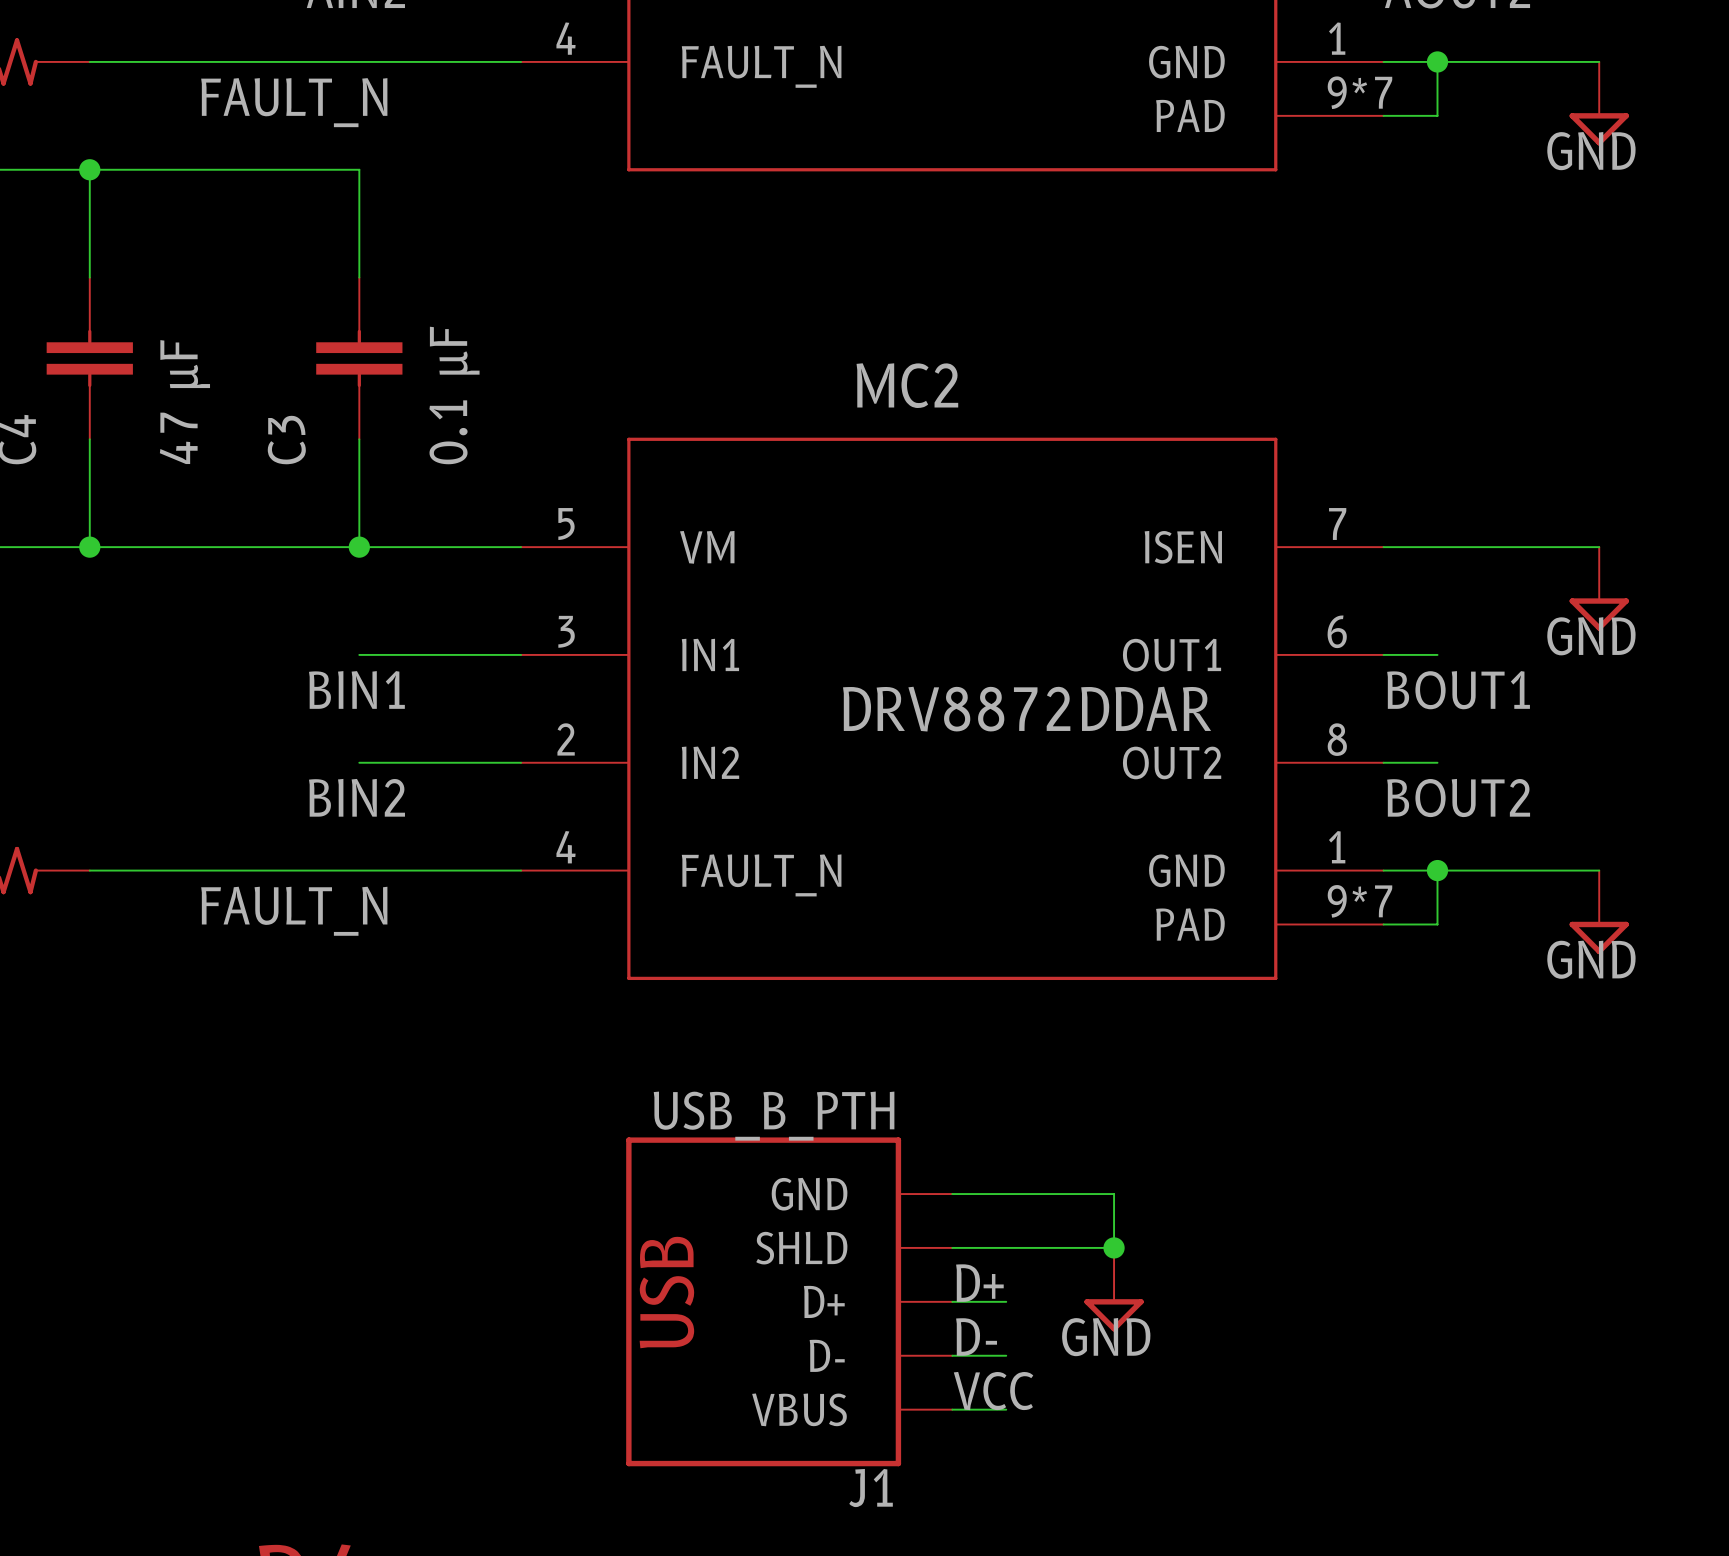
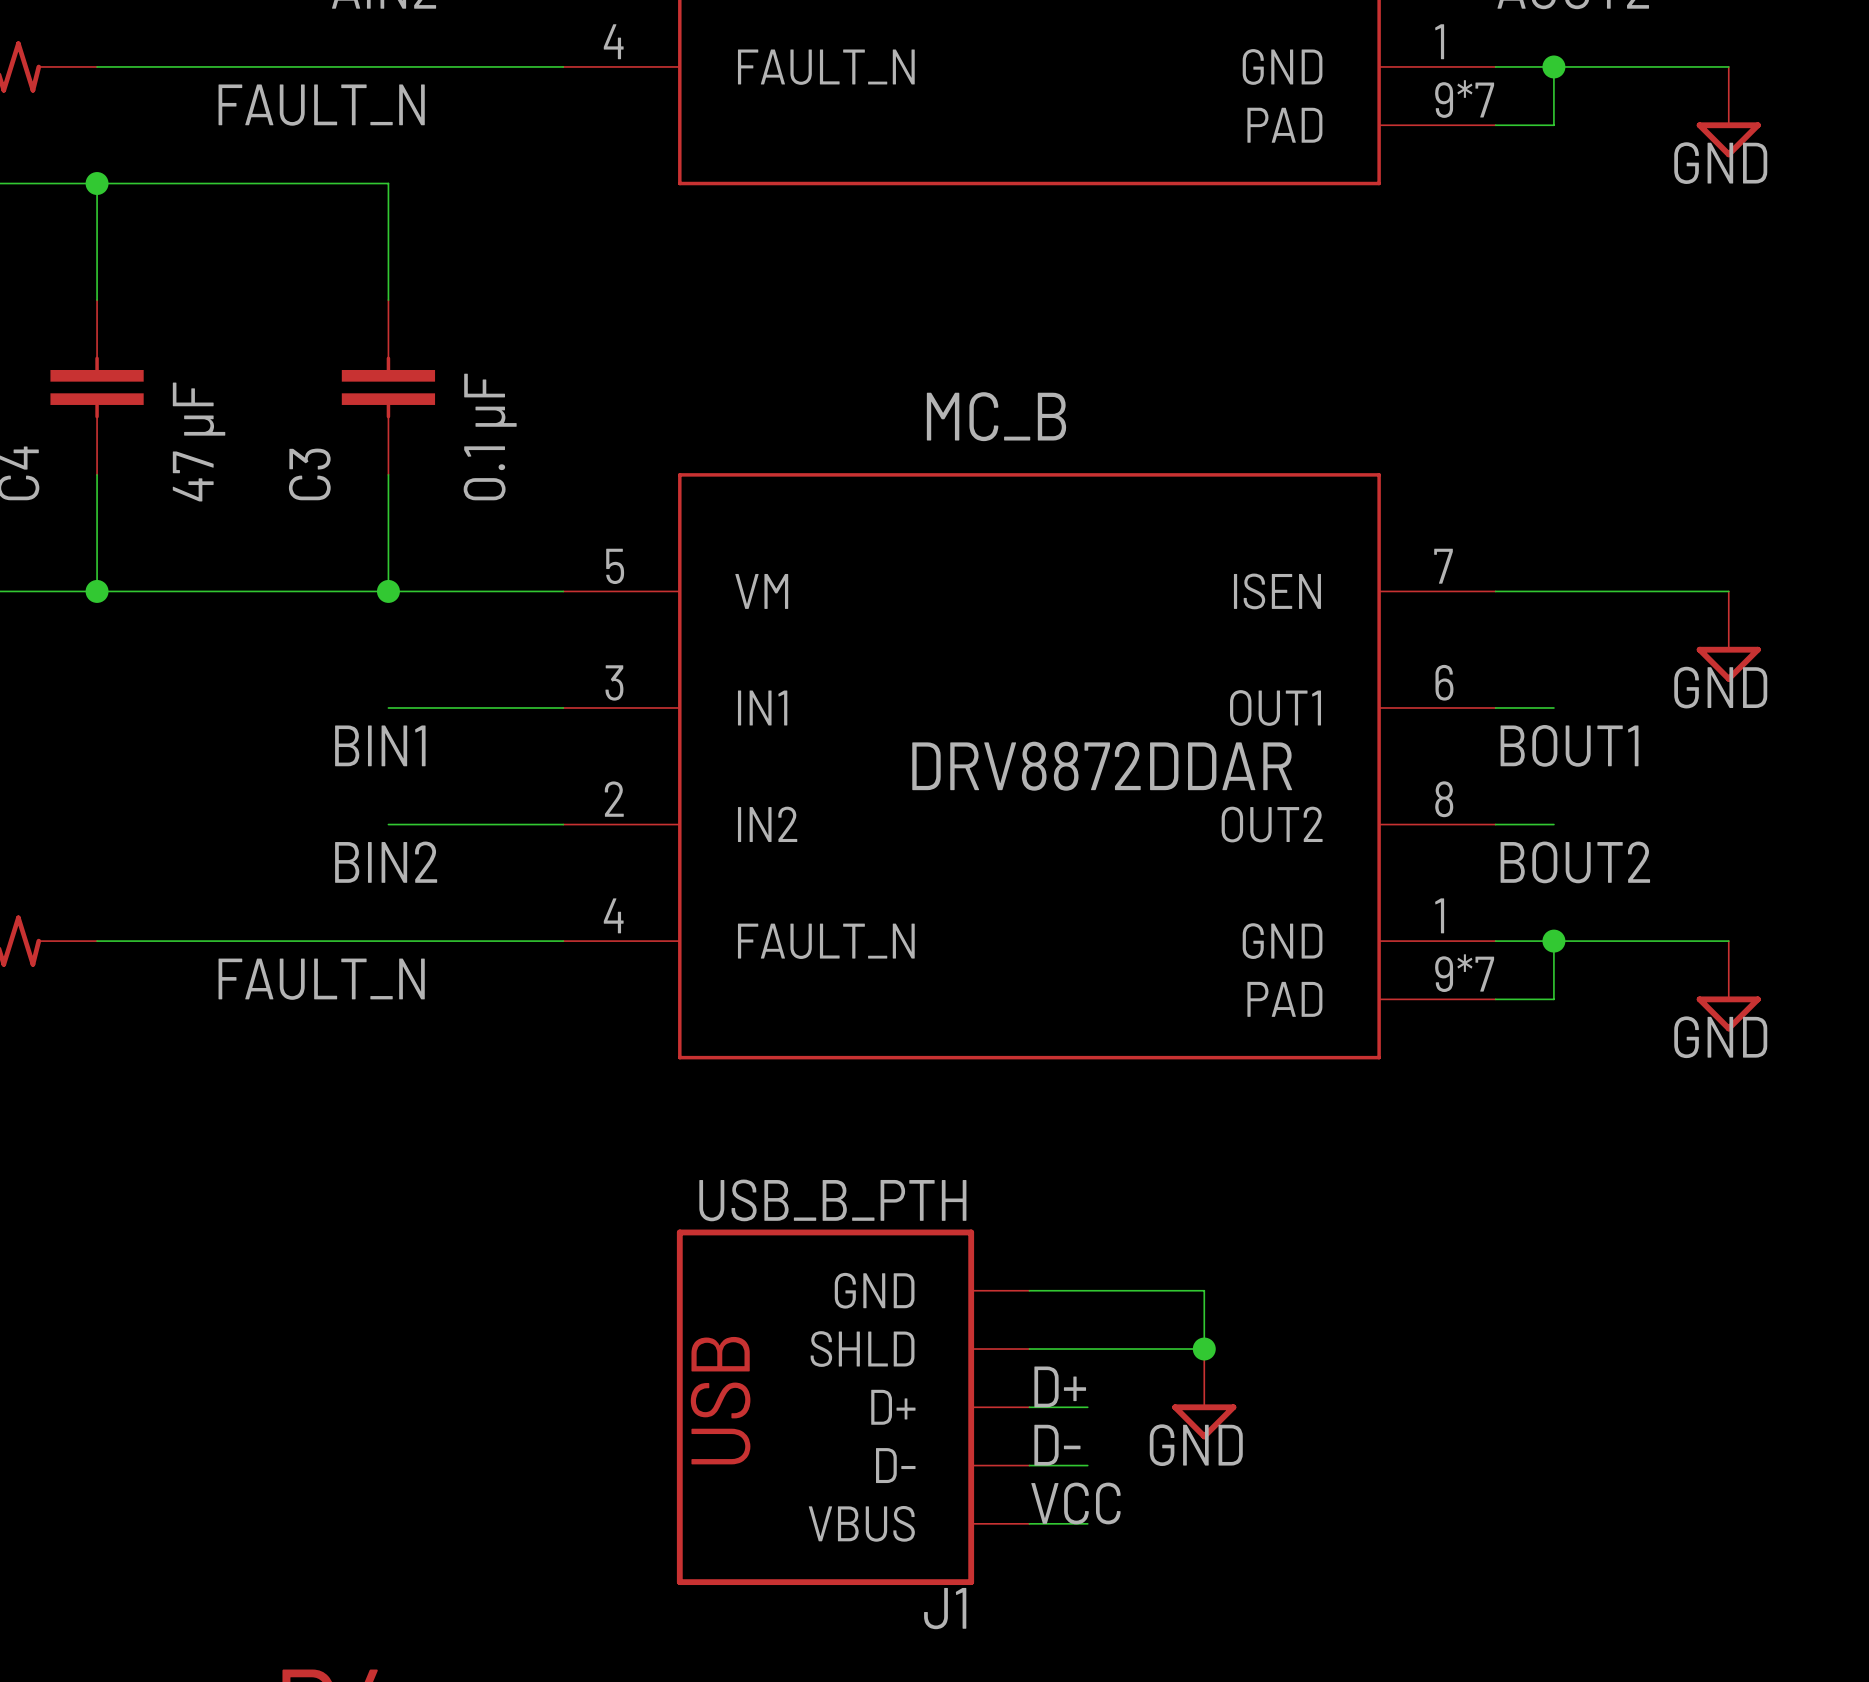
MC2 name: MC2 (907, 385) -> MC_B (996, 416)

